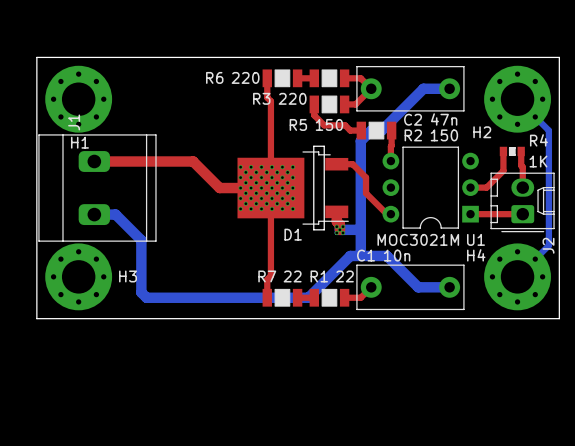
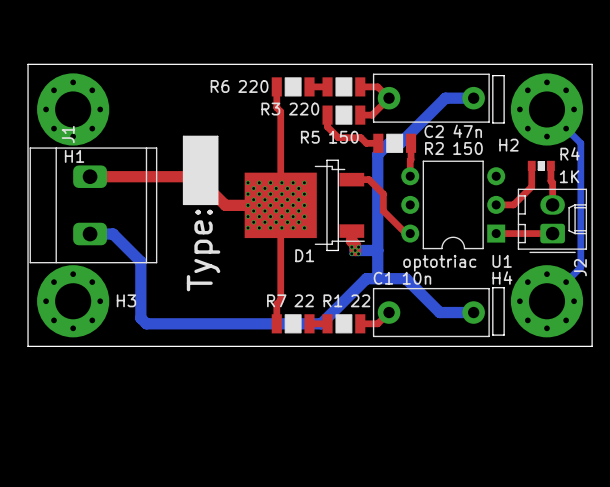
board edge: none -> (492, 75) (504, 75) (504, 123) (492, 123) (492, 75)
drawing: none -> [182, 135, 219, 206]
U1 value: MOC3021M (418, 239) -> optotriac (439, 263)
board edge: none -> (492, 287) (492, 335) (504, 335) (504, 287) (492, 287)

